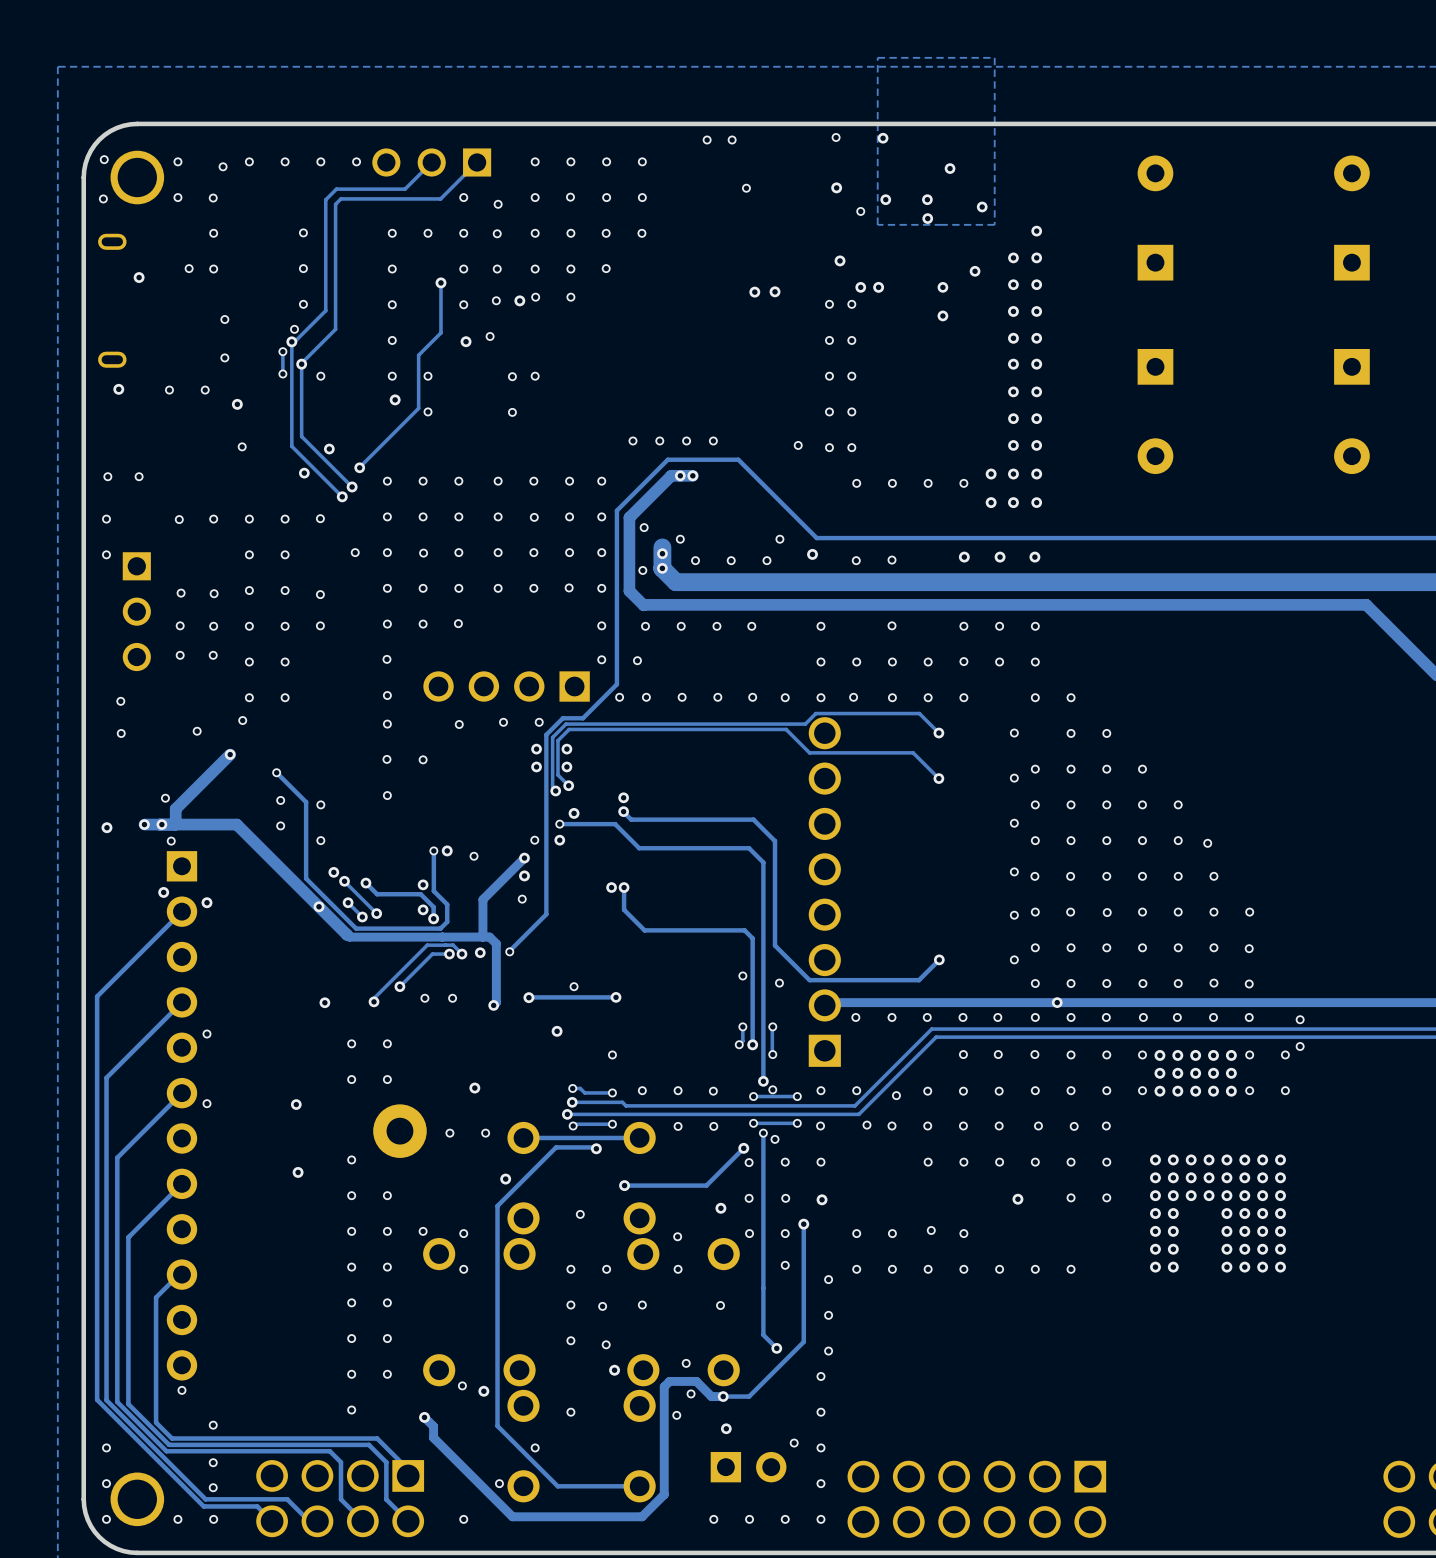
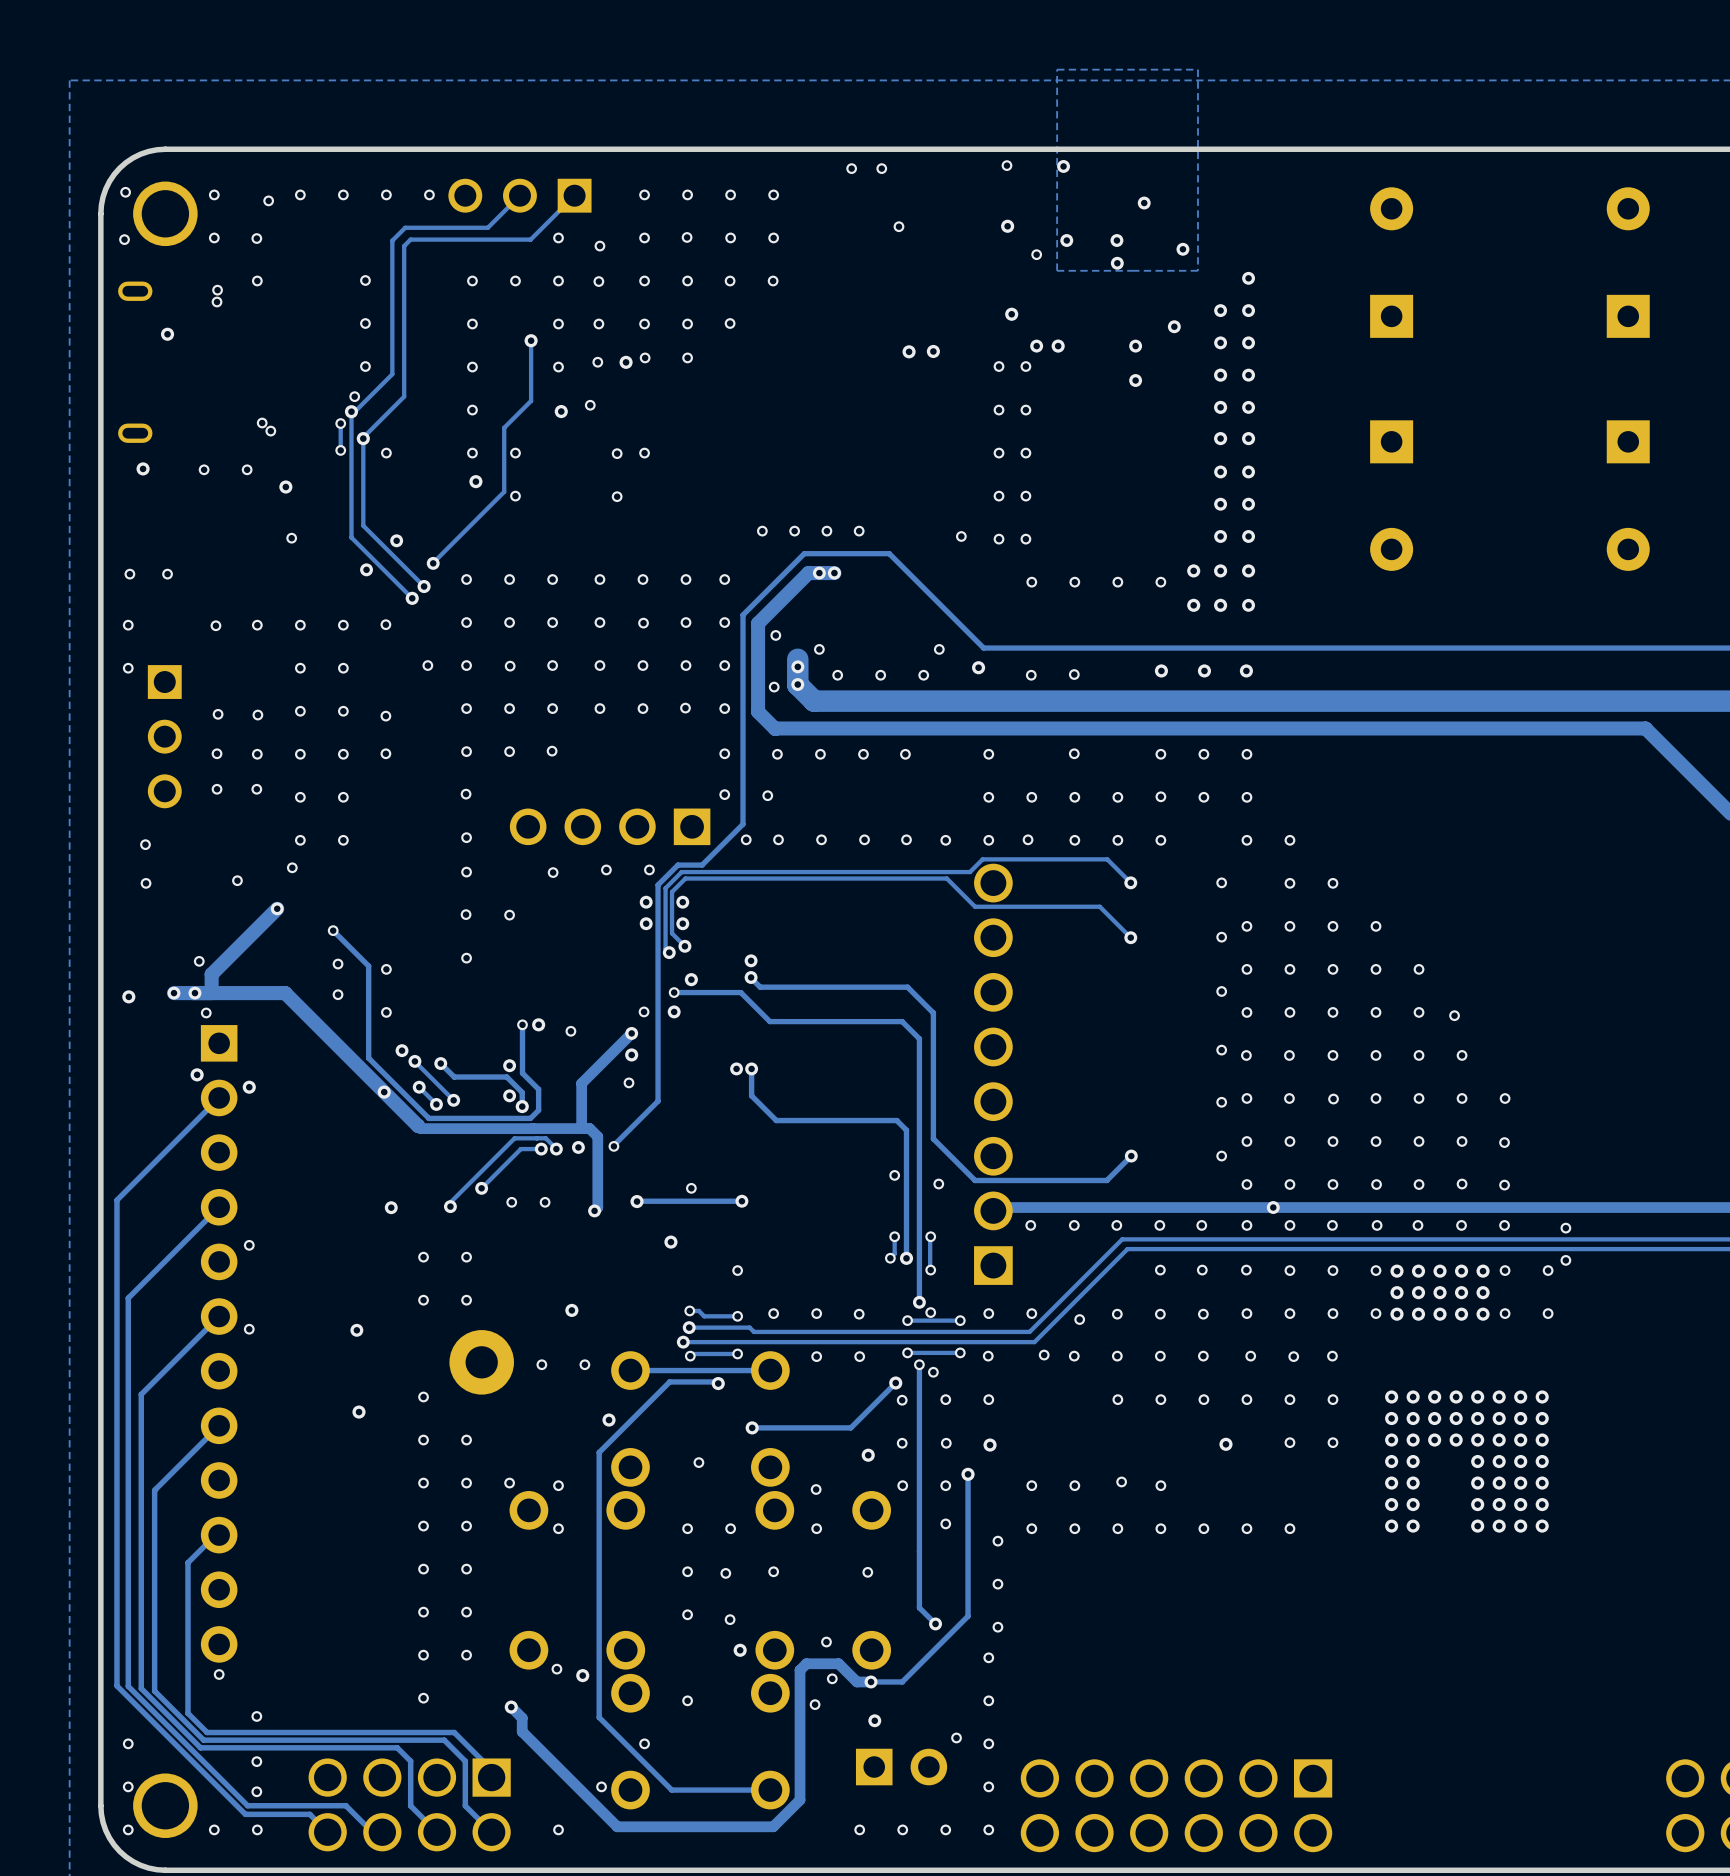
via: none -> (217, 290)
via: none -> (217, 301)
via: (189, 268) -> none
via: (213, 269) -> none
via position: (224, 319) -> (262, 423)

